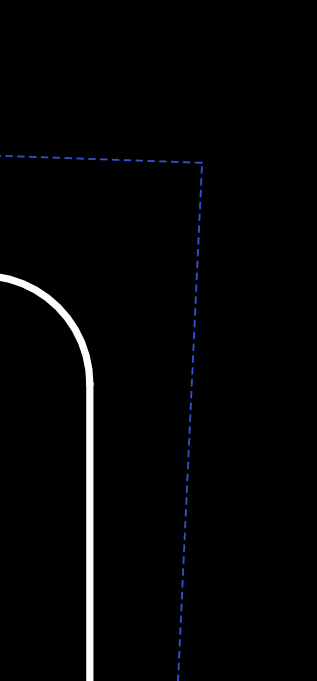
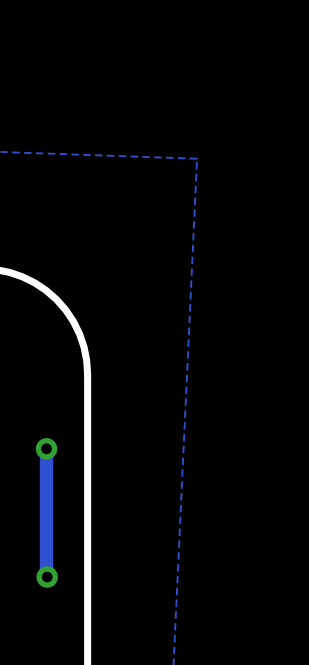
track: none -> (46, 448) (47, 577)
via: none -> (46, 448)
via: none -> (47, 577)

